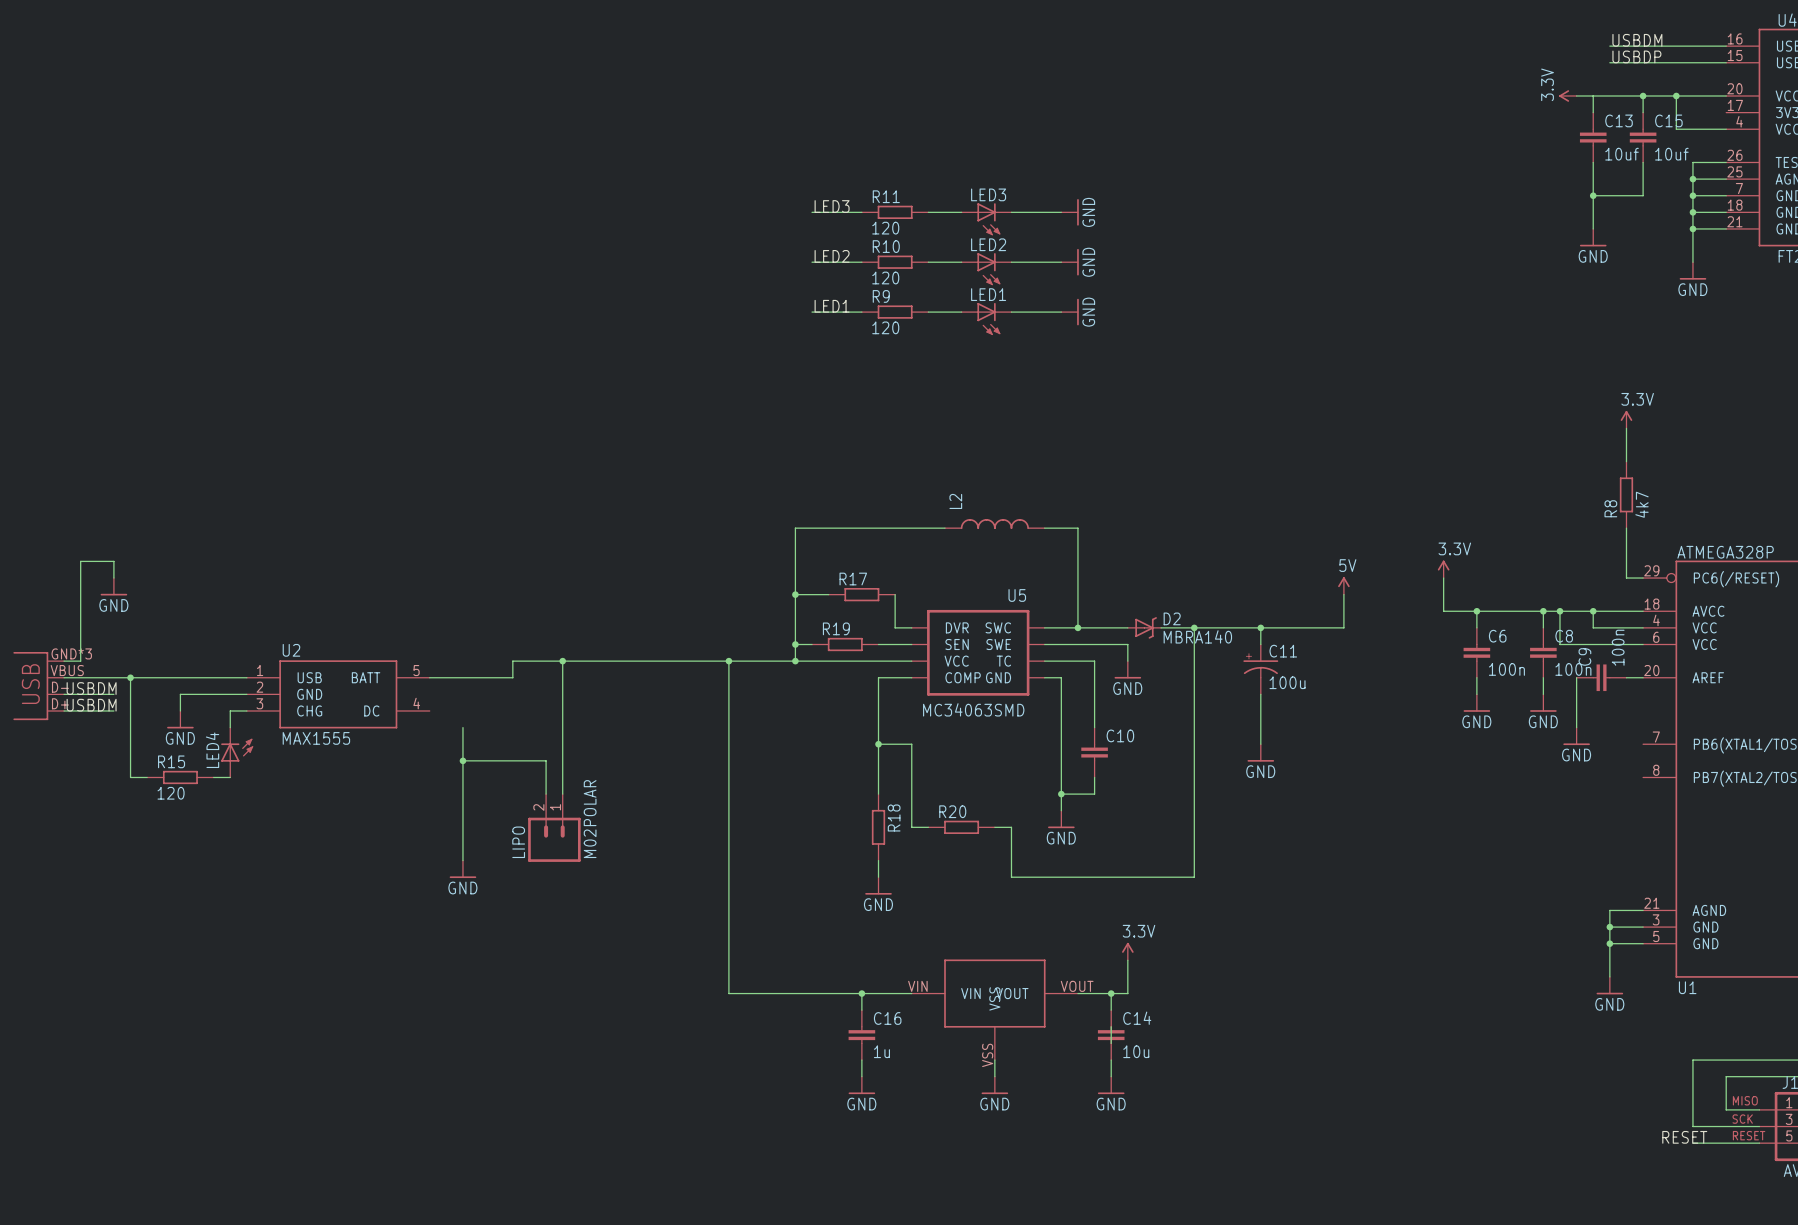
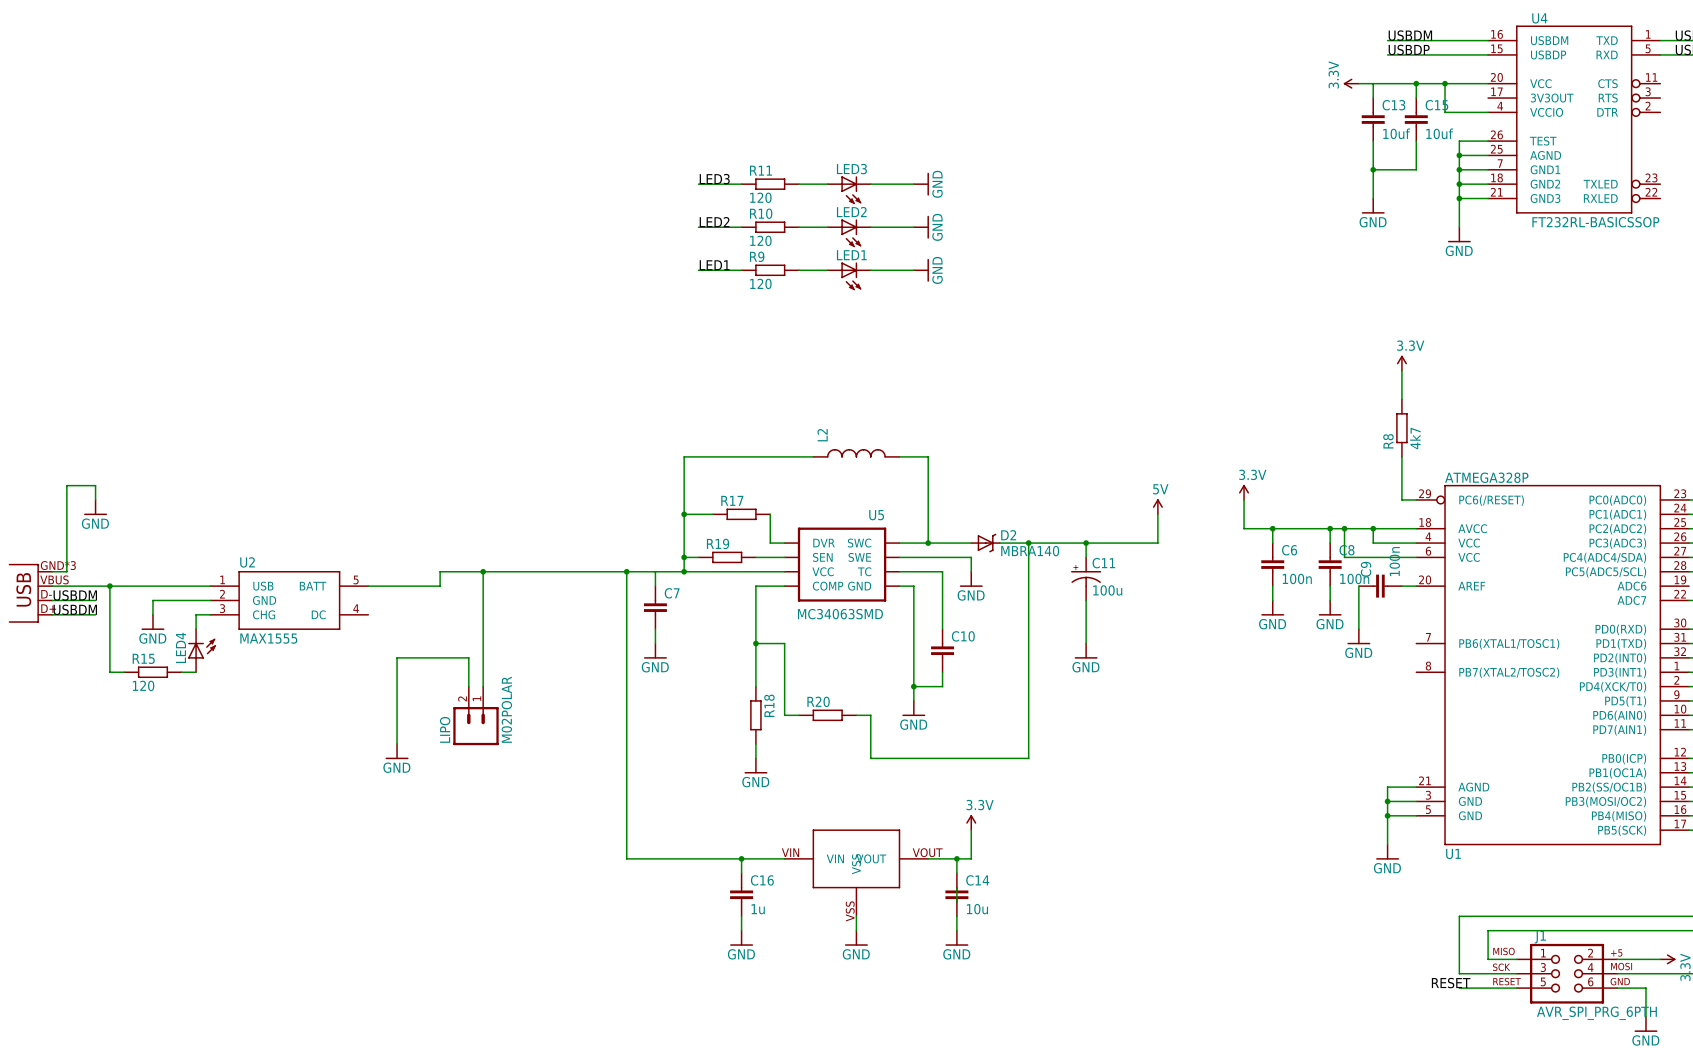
wire: none -> (655, 571) (655, 586)
C7: none -> (655, 607)
wire: (462, 727) (462, 760) -> none
wire: none -> (655, 629) (655, 643)
power symbol: none -> GND (655, 651)
junction: (462, 760) -> none

